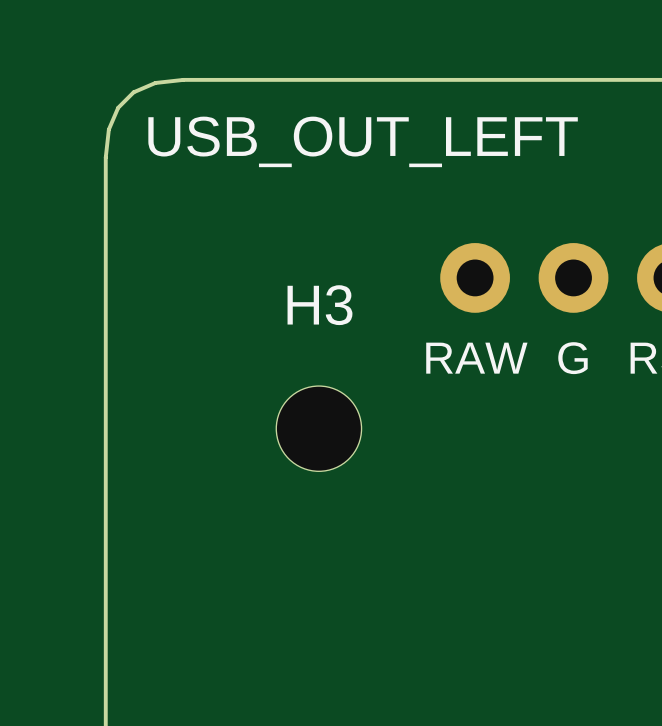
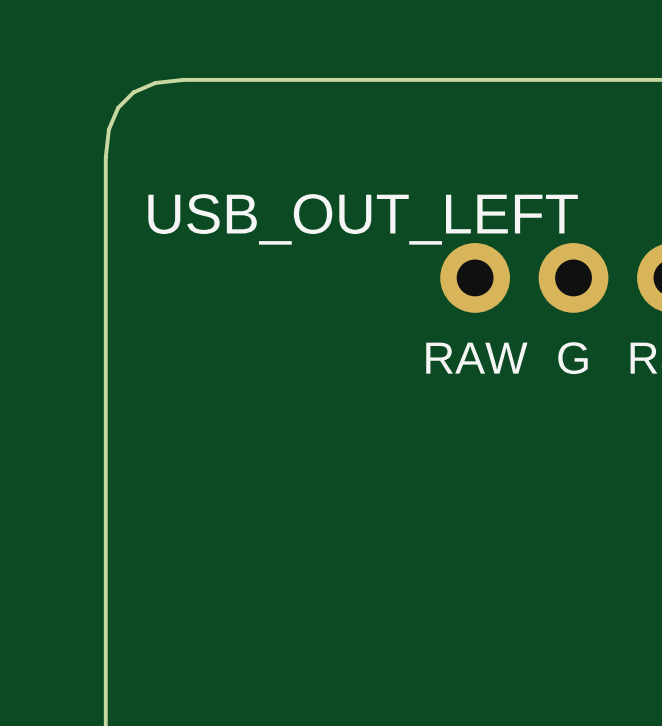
text position: USB_OUT_LEFT (363, 141) -> USB_OUT_LEFT (363, 219)
H3: (318, 428) -> none

